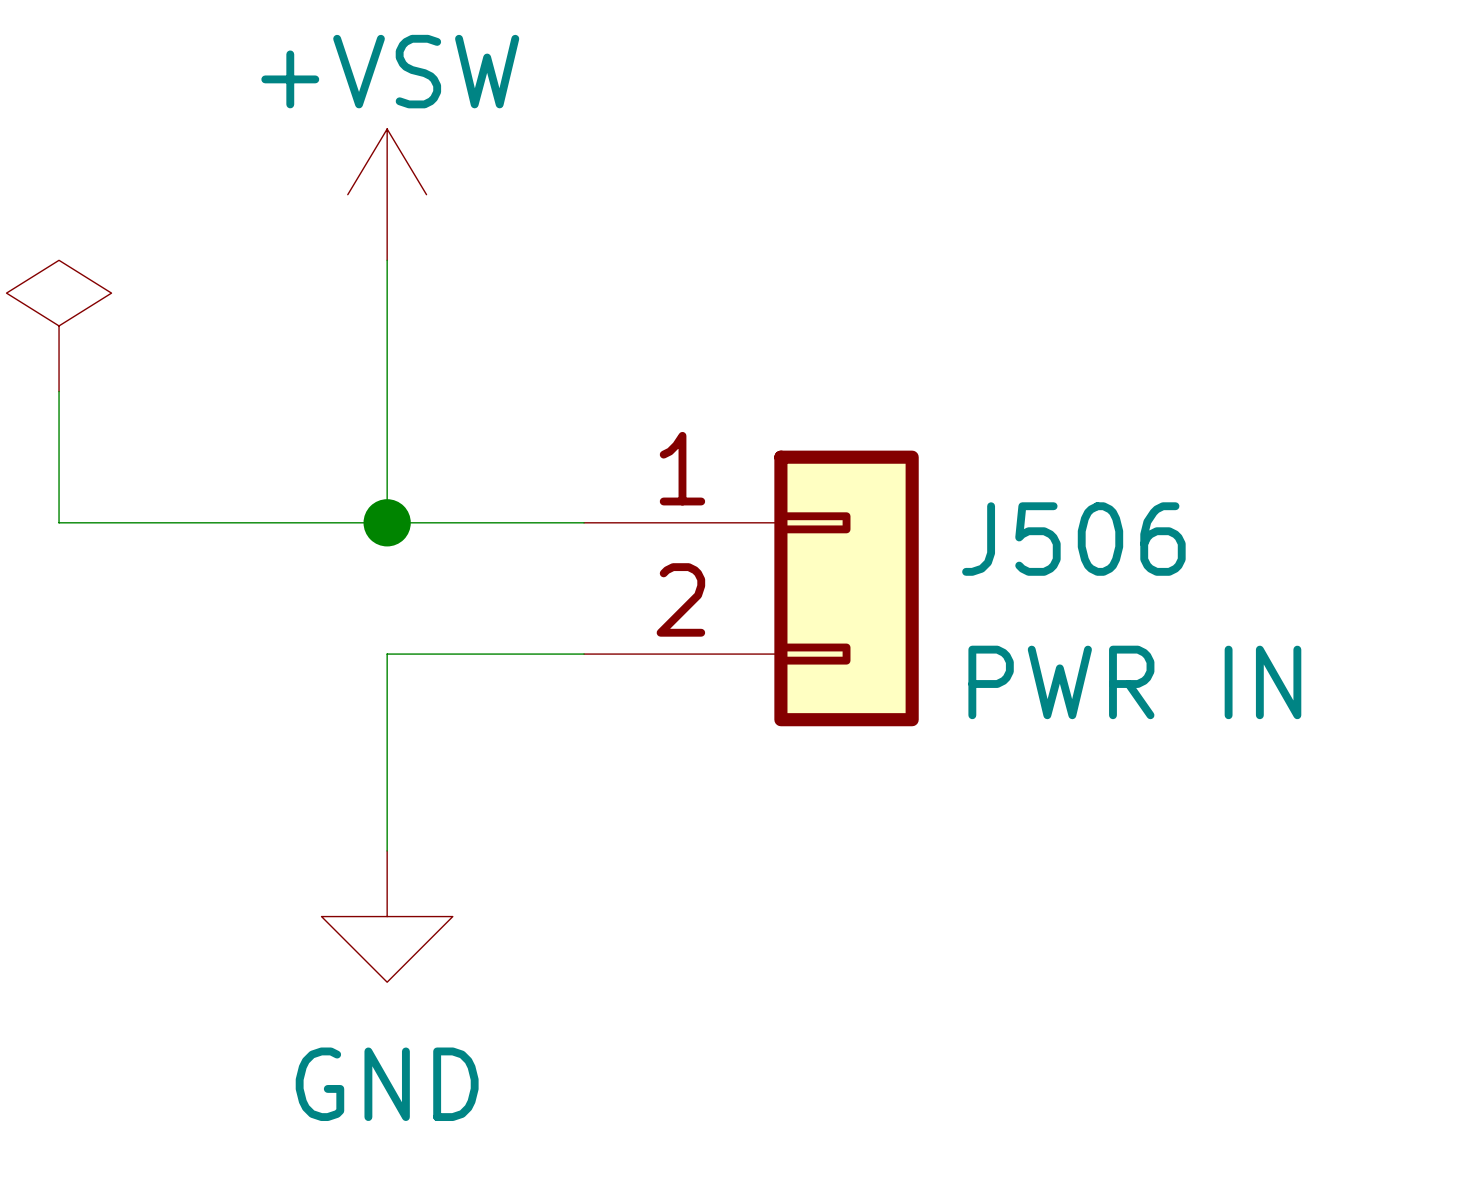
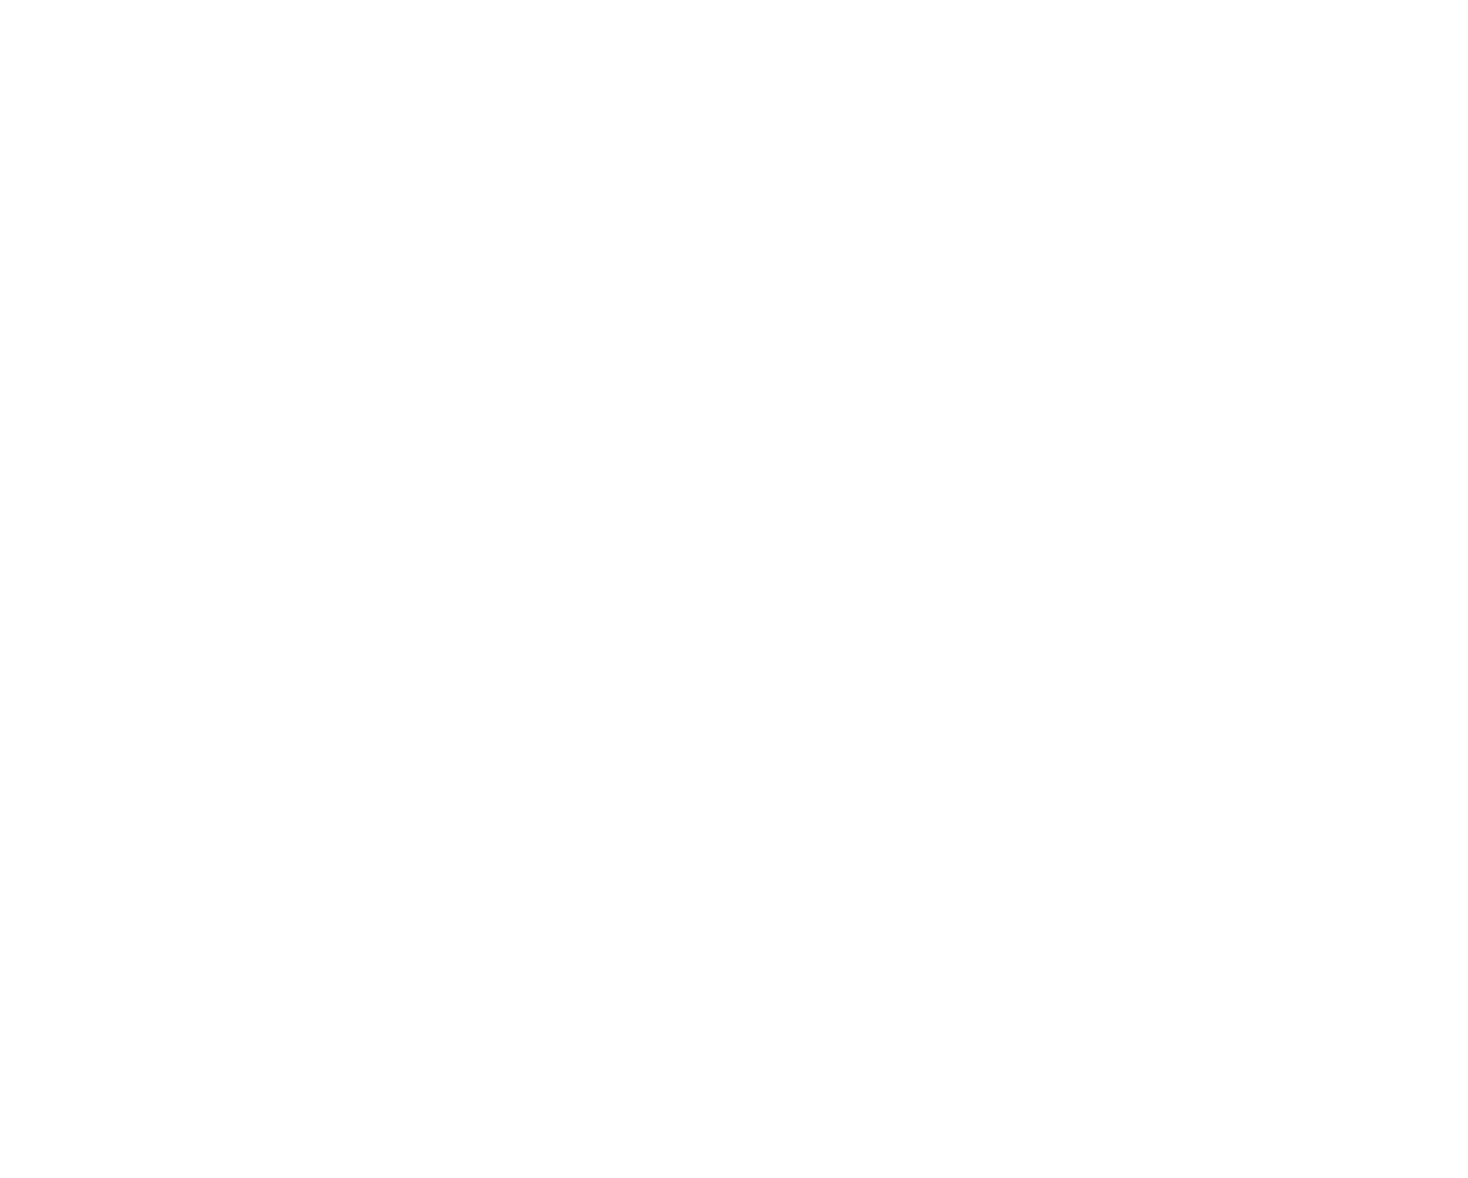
power symbol: +VSW (387, 194) -> none
wire: (387, 260) (387, 522) -> none
power symbol: (59, 325) -> none
wire: (59, 391) (59, 522) (584, 522) -> none
junction: (387, 522) -> none
J506: PWR IN (751, 588) -> none
wire: (584, 654) (387, 654) (387, 850) -> none
power symbol: GND (387, 916) -> none

